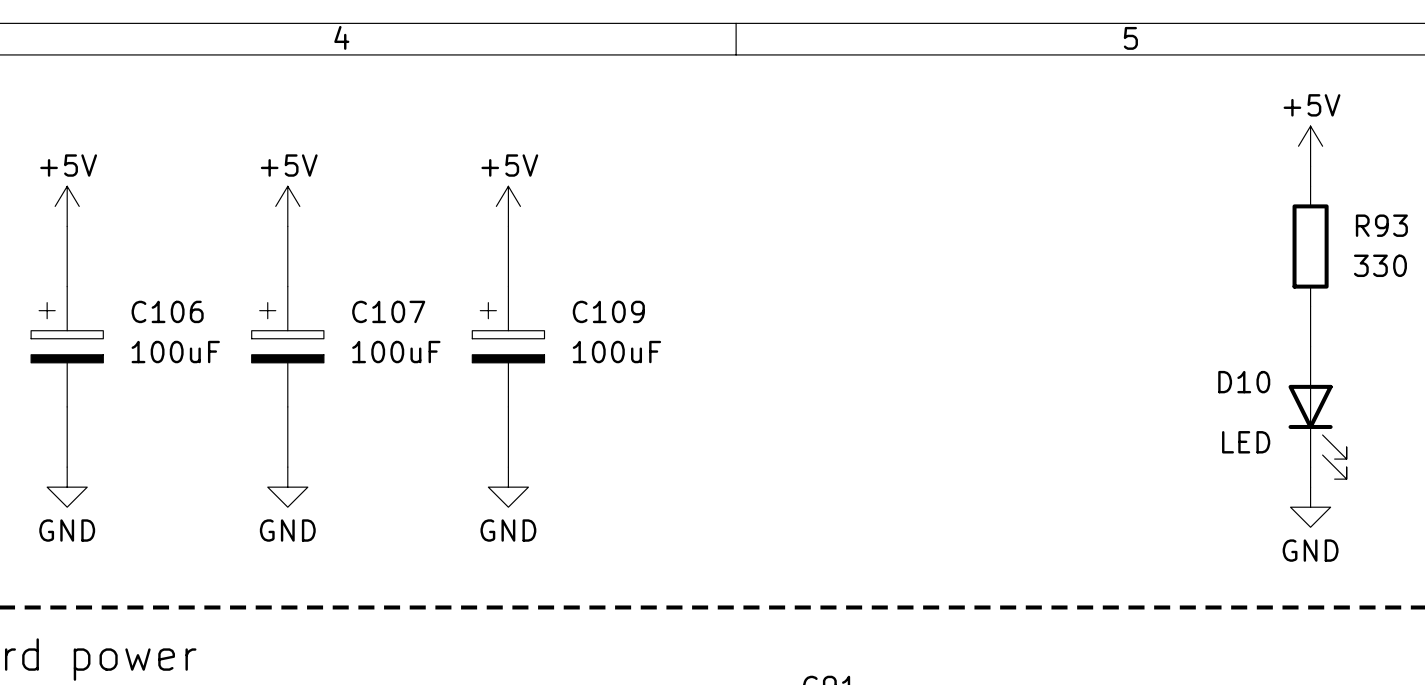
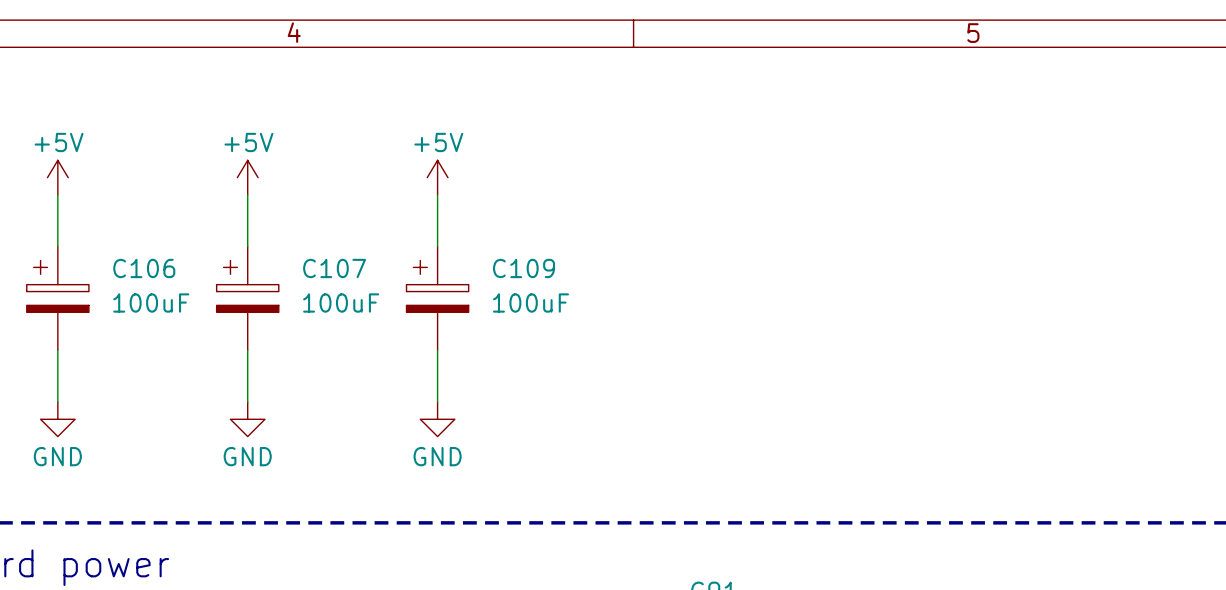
power symbol: +5V (1310, 146) -> none
wire: (1310, 166) (1310, 186) -> none
R93: 330 (1310, 246) -> none
wire: (1310, 306) (1310, 346) -> none
D10: LED (1317, 412) -> none
wire: (1310, 467) (1310, 487) -> none
power symbol: GND (1310, 507) -> none

